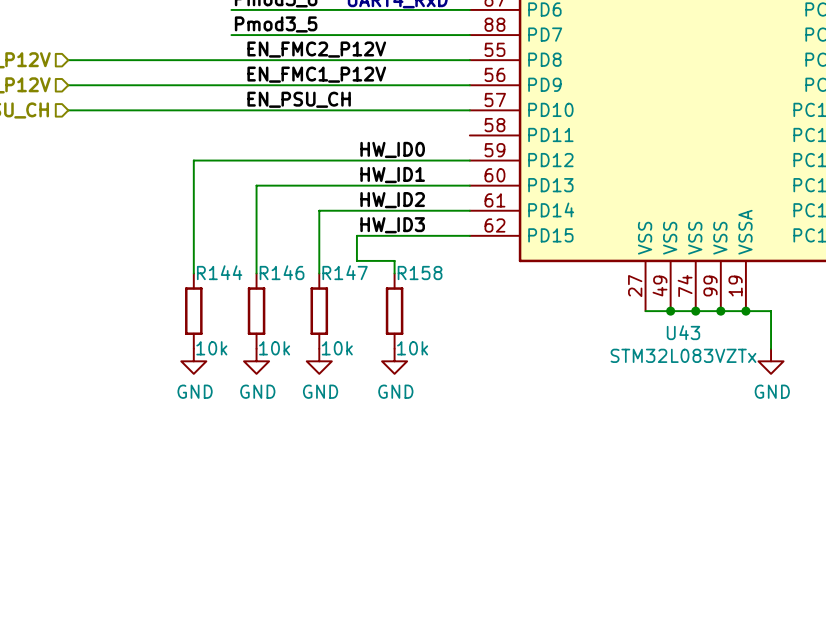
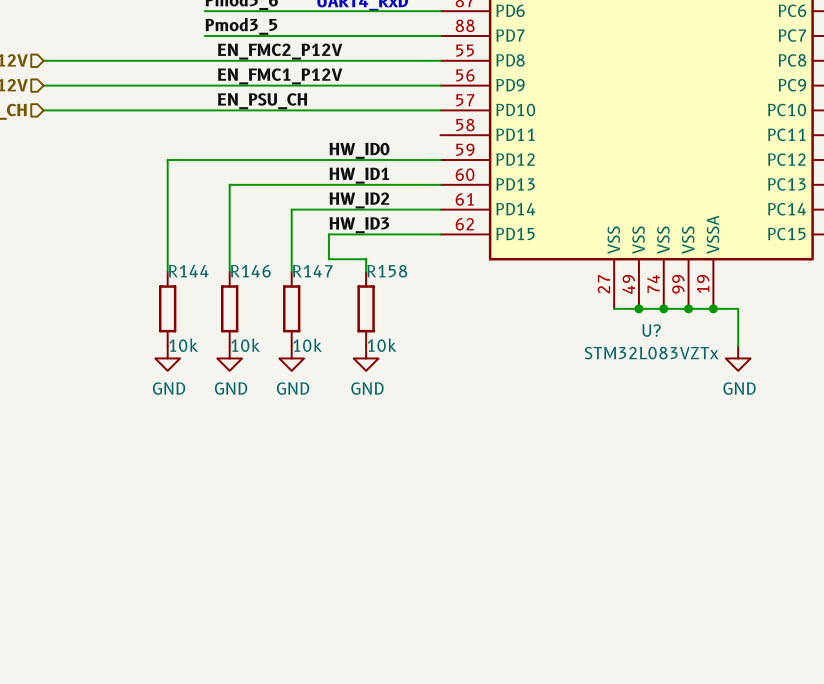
U43 name: U43 (683, 332) -> U? (651, 330)

